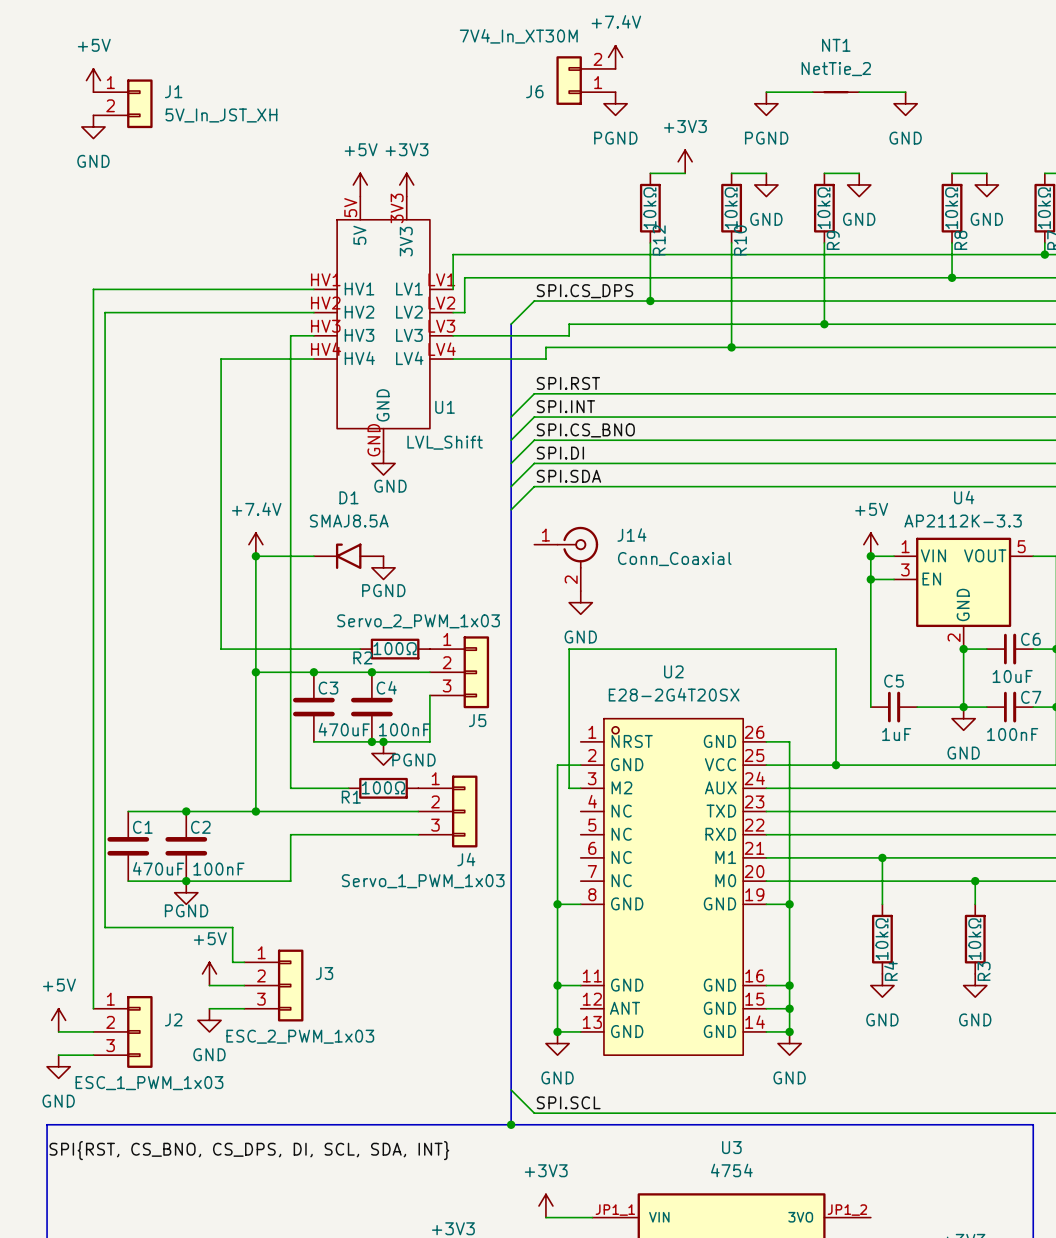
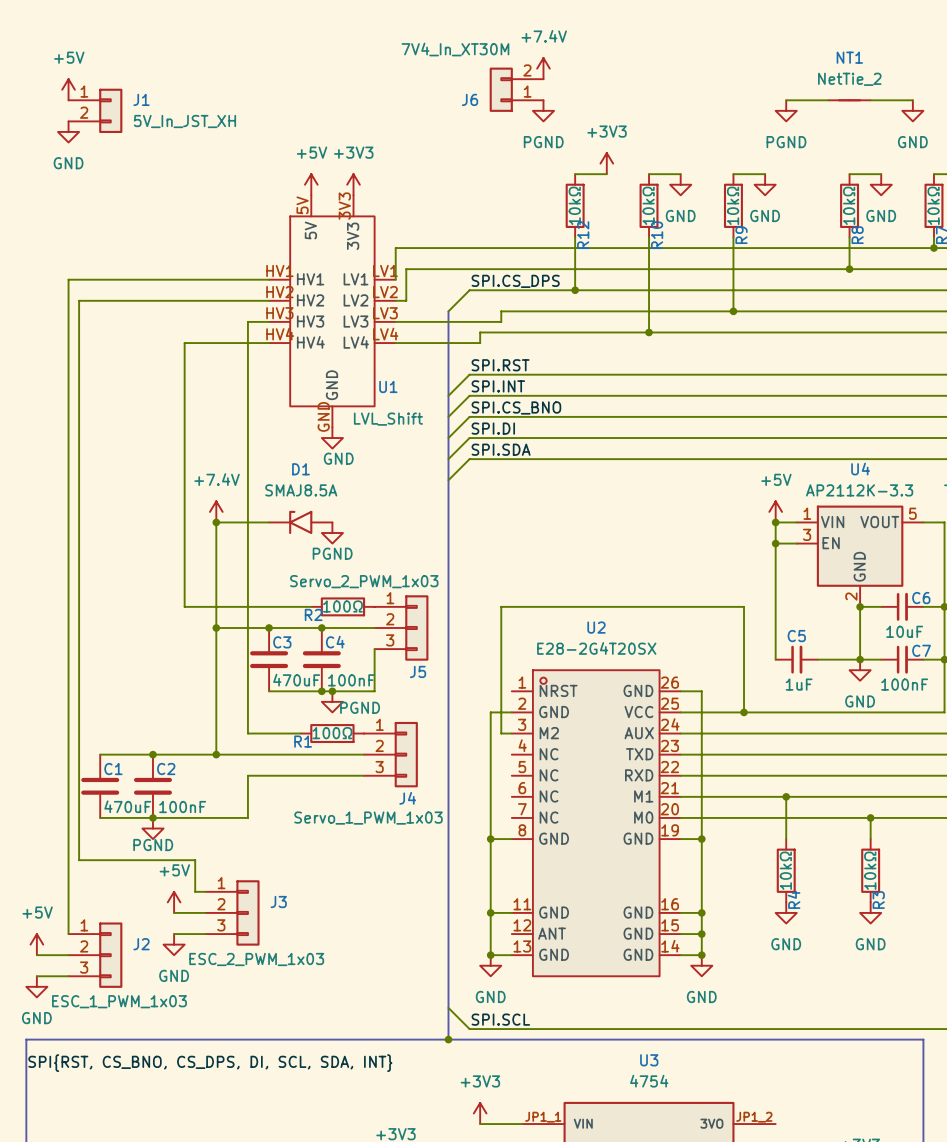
wire: (766, 92) (812, 92) -> (870, 100) (912, 100)
NT1 position: (836, 92) -> (849, 100)
wire: (859, 92) (882, 92) -> (807, 100) (828, 100)
power symbol position: PGND (766, 103) -> PGND (786, 110)
power symbol: GND (905, 103) -> none
power symbol: none -> GND (912, 110)
J14: Conn_Coaxial (566, 558) -> none
power symbol: GND (580, 602) -> none

